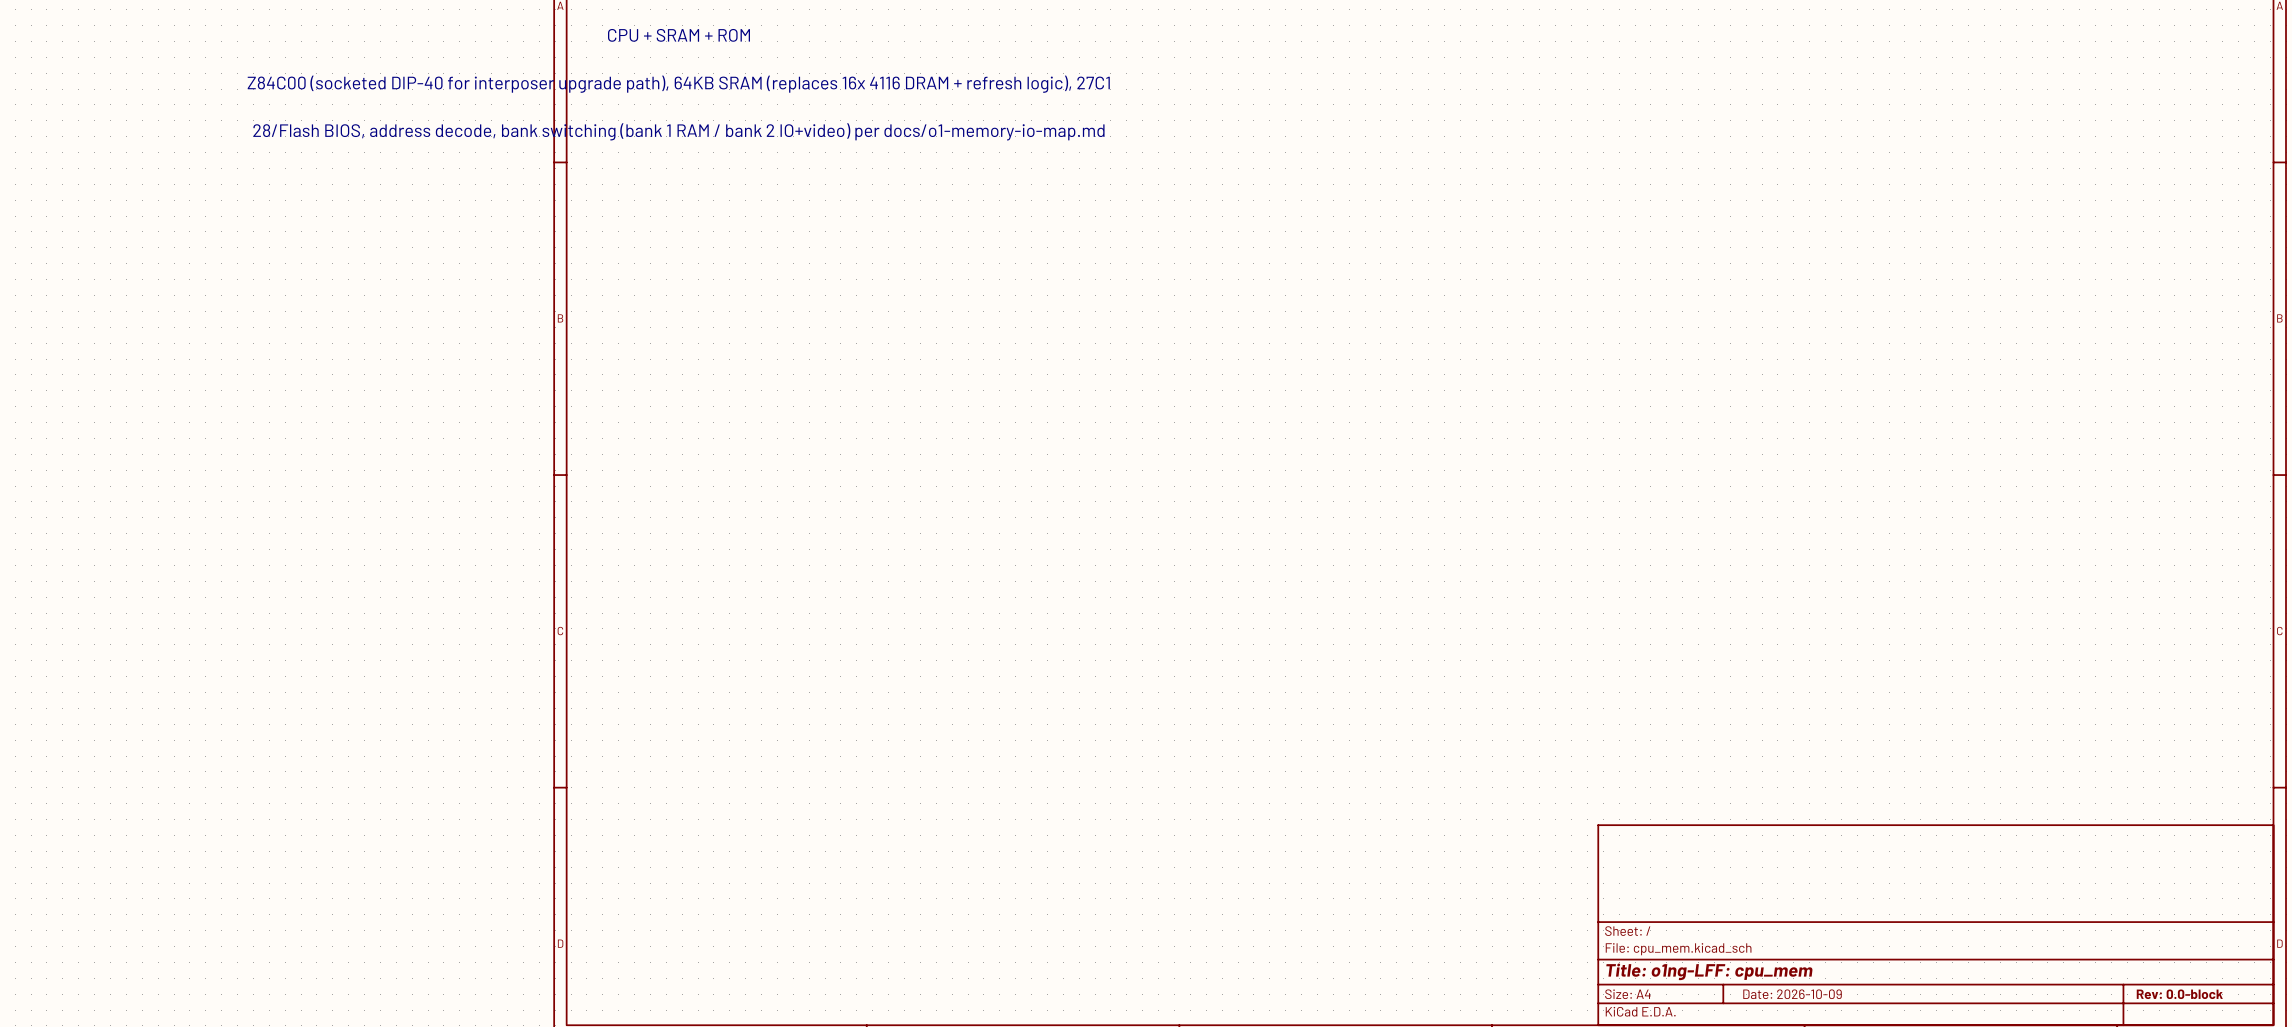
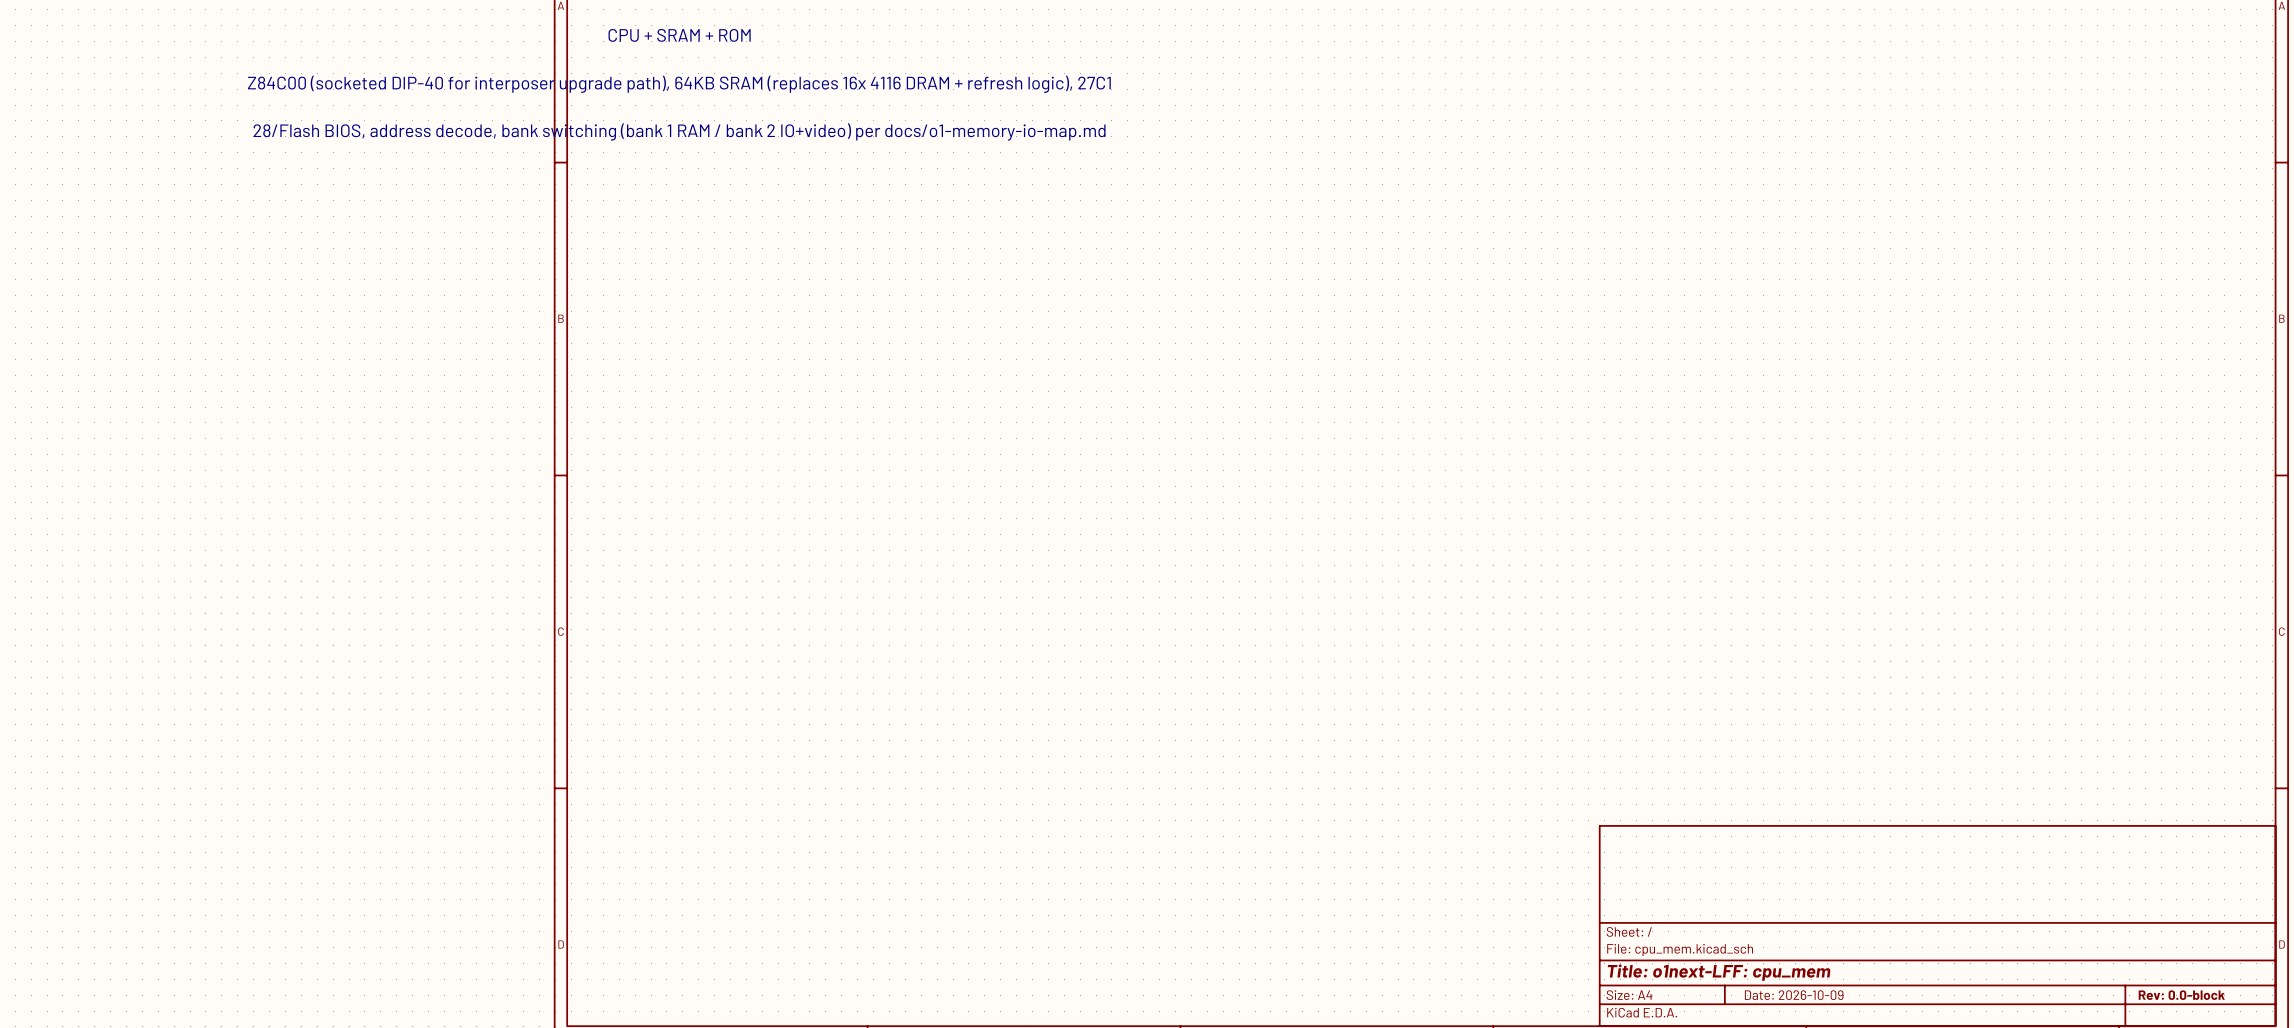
title block: Title: o1ng-LFF: cpu_mem (1709, 971) -> Title: o1next-LFF: cpu_mem (1719, 972)

